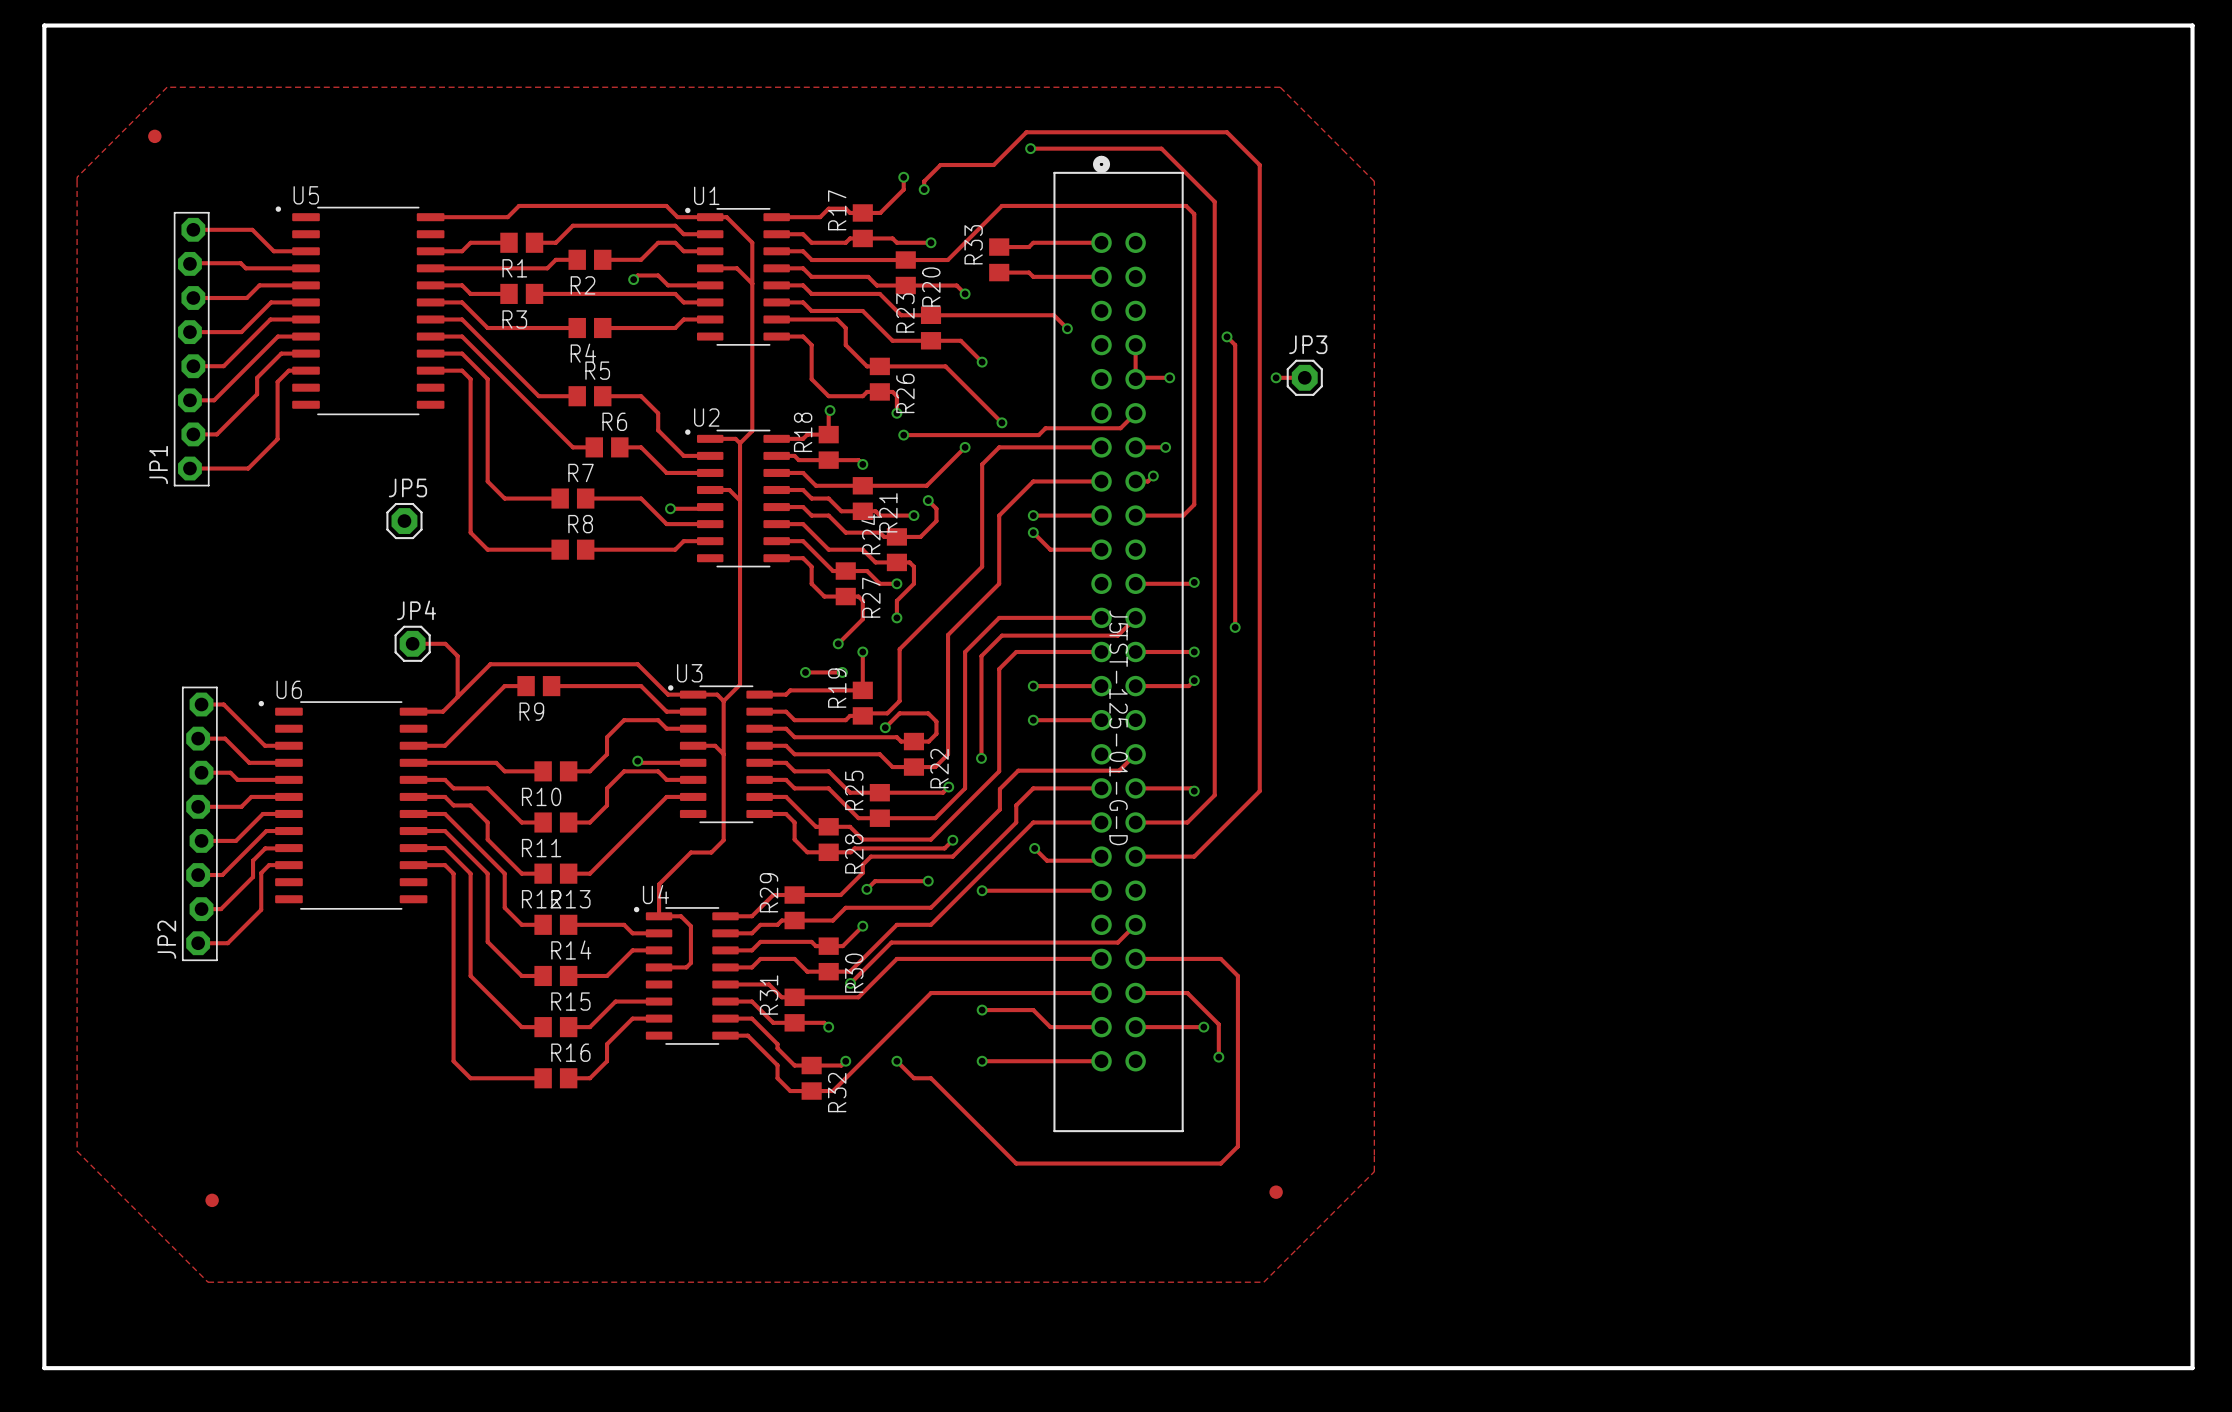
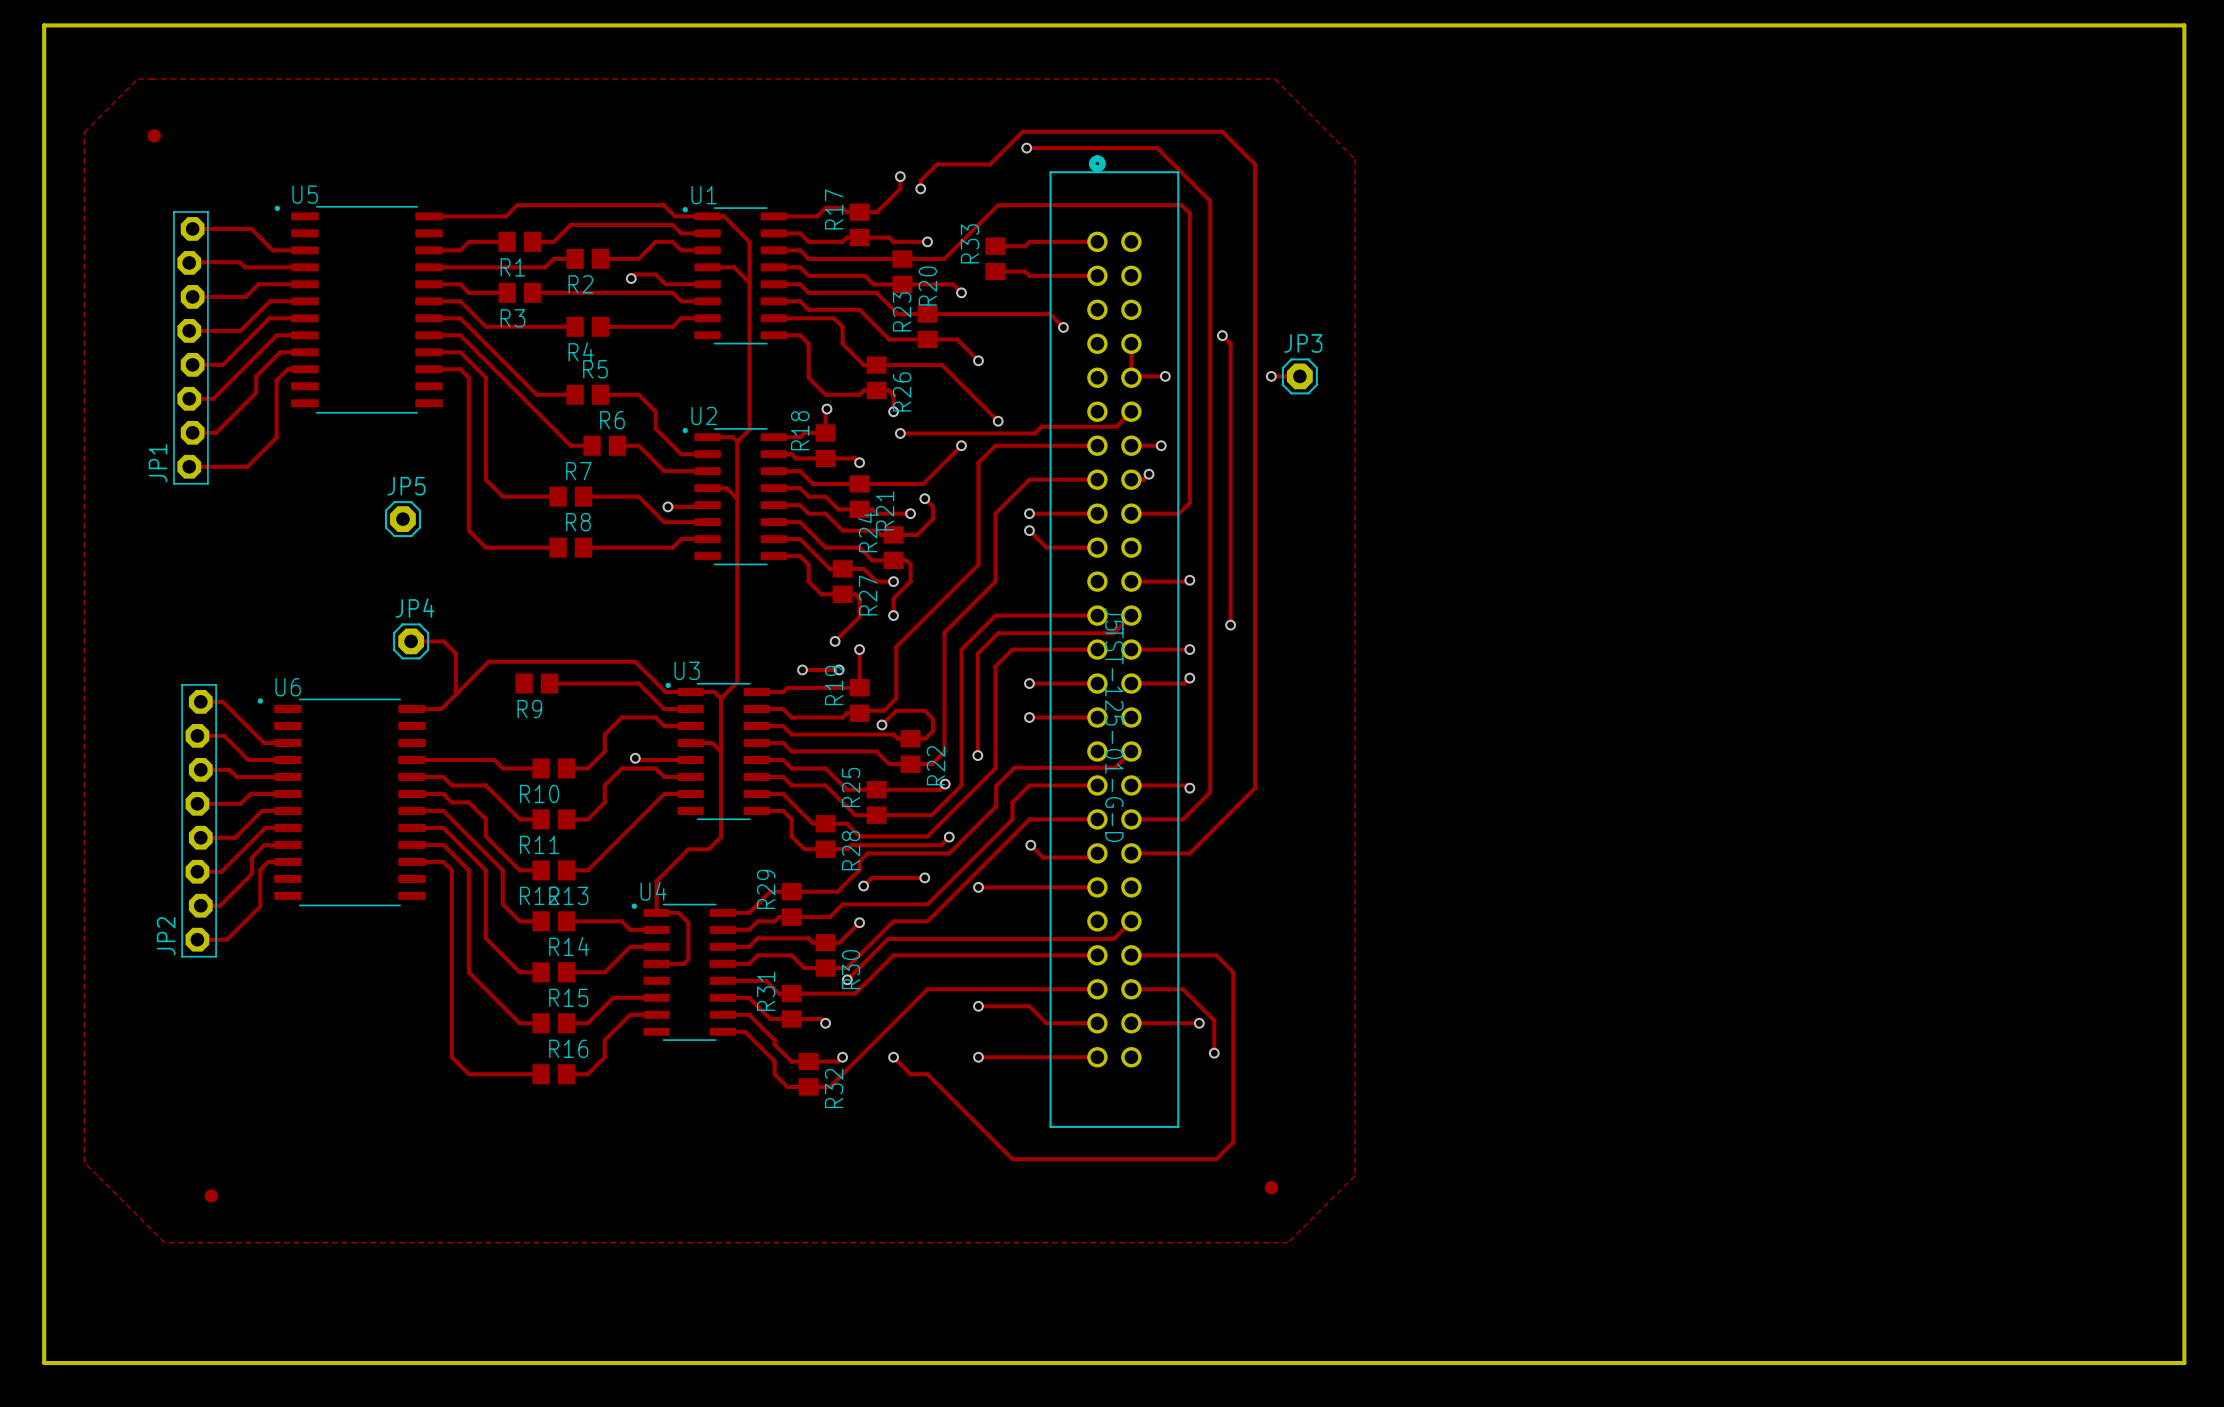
zone outline: (167, 87) (77, 177) (77, 1151) (208, 1282) (1263, 1282) (1374, 1171) (1374, 181) (1280, 87) (167, 87) -> (137, 78) (84, 132) (84, 1162) (164, 1242) (1288, 1242) (1355, 1175) (1355, 159) (1274, 78) (137, 78)
track: (526, 686) (504, 686) (445, 745) (413, 745) -> none

